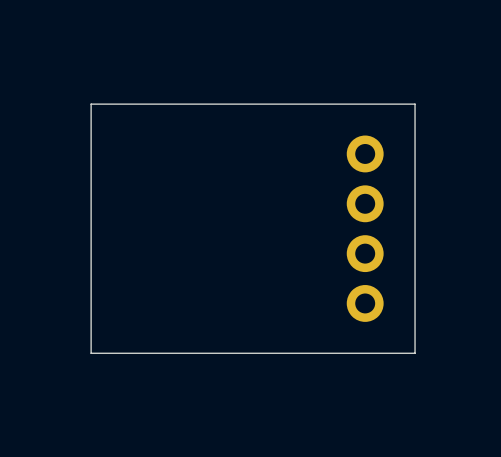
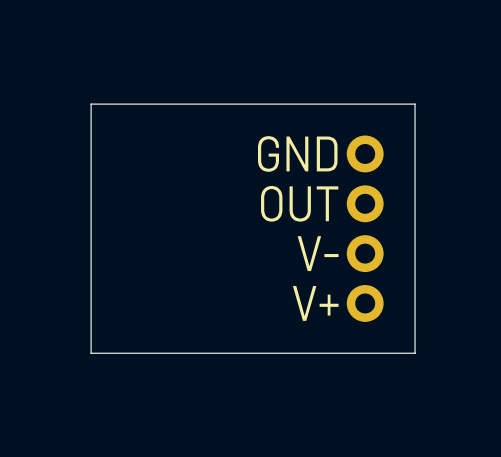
text: none -> GND (297, 153)
text: none -> OUT (299, 203)
text: none -> V- (318, 253)
text: none -> V+ (315, 303)

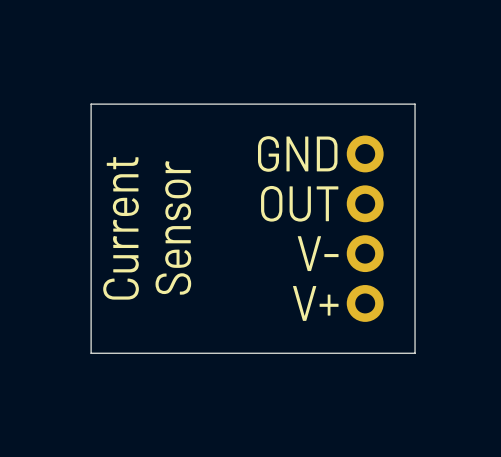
text: none -> Sensor (173, 227)
text: none -> Current (121, 228)

